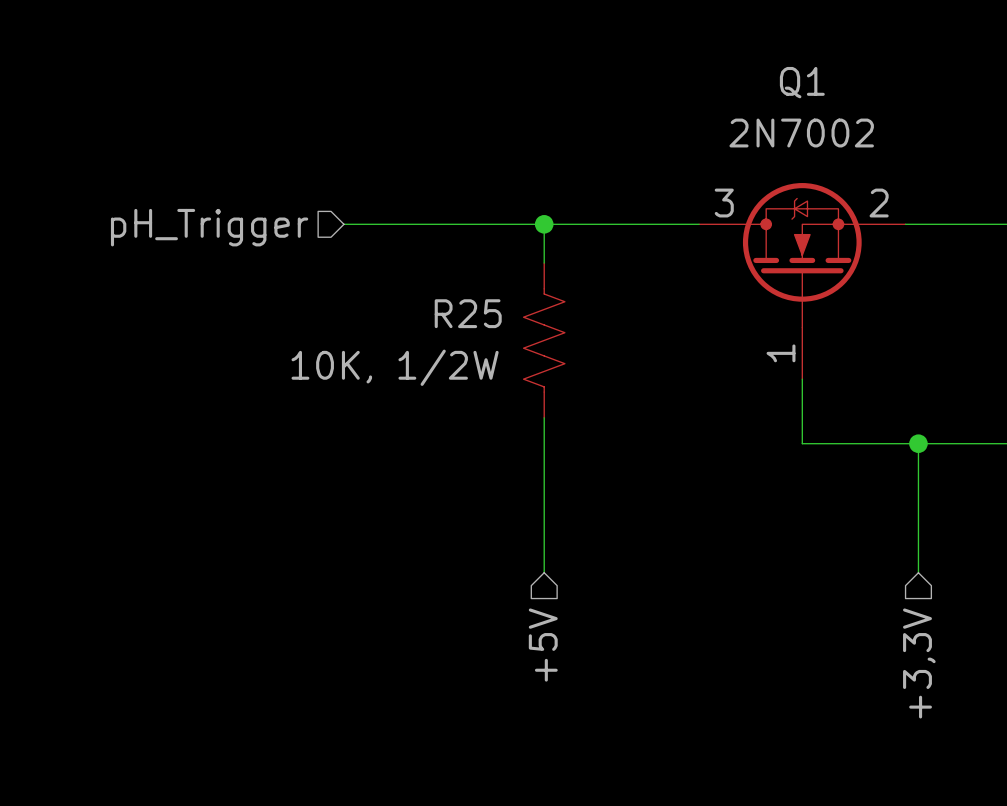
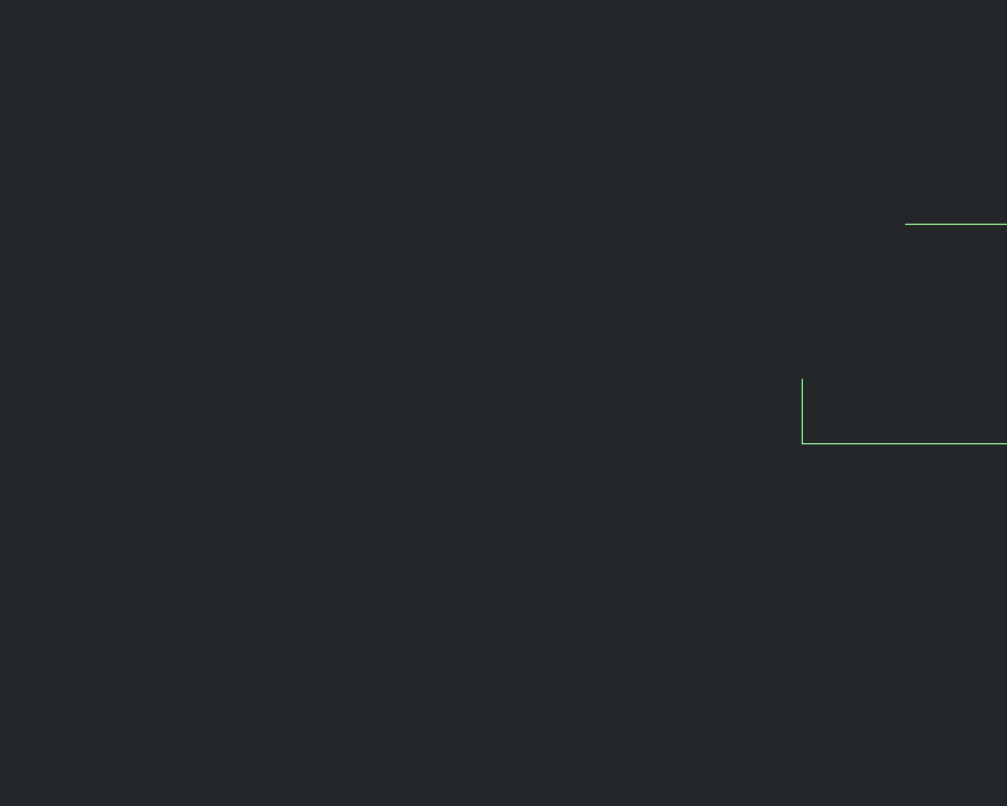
wire: (343, 224) (699, 224) -> none
wire: (544, 224) (544, 263) -> none
junction: (544, 224) -> none
hierarchical label: pH_Trigger (209, 227) -> none
Q1: 2N7002 (802, 281) -> none
R25: 10K, 1/2W (544, 340) -> none
wire: (544, 417) (544, 572) -> none
wire: (918, 443) (918, 572) -> none
junction: (918, 443) -> none
hierarchical label: +5V (543, 645) -> none
hierarchical label: +3,3V (919, 663) -> none

